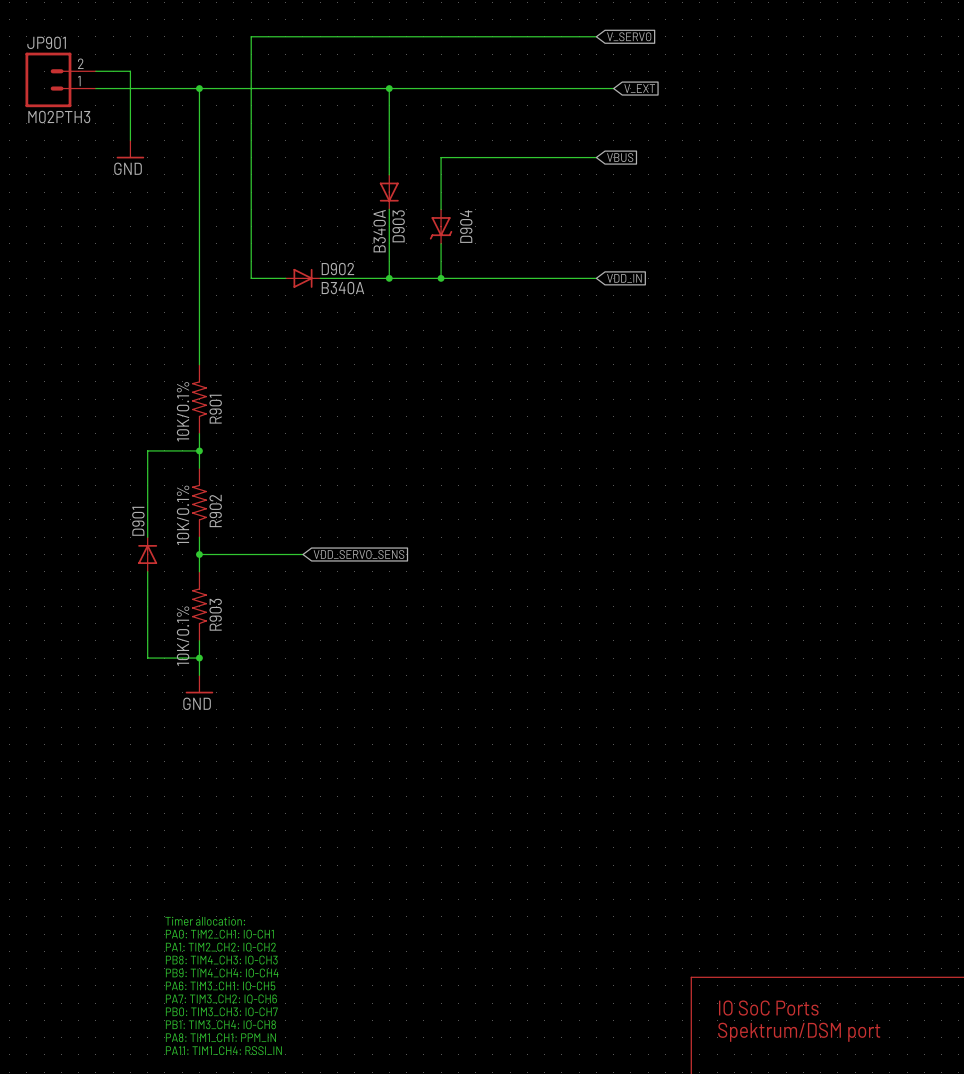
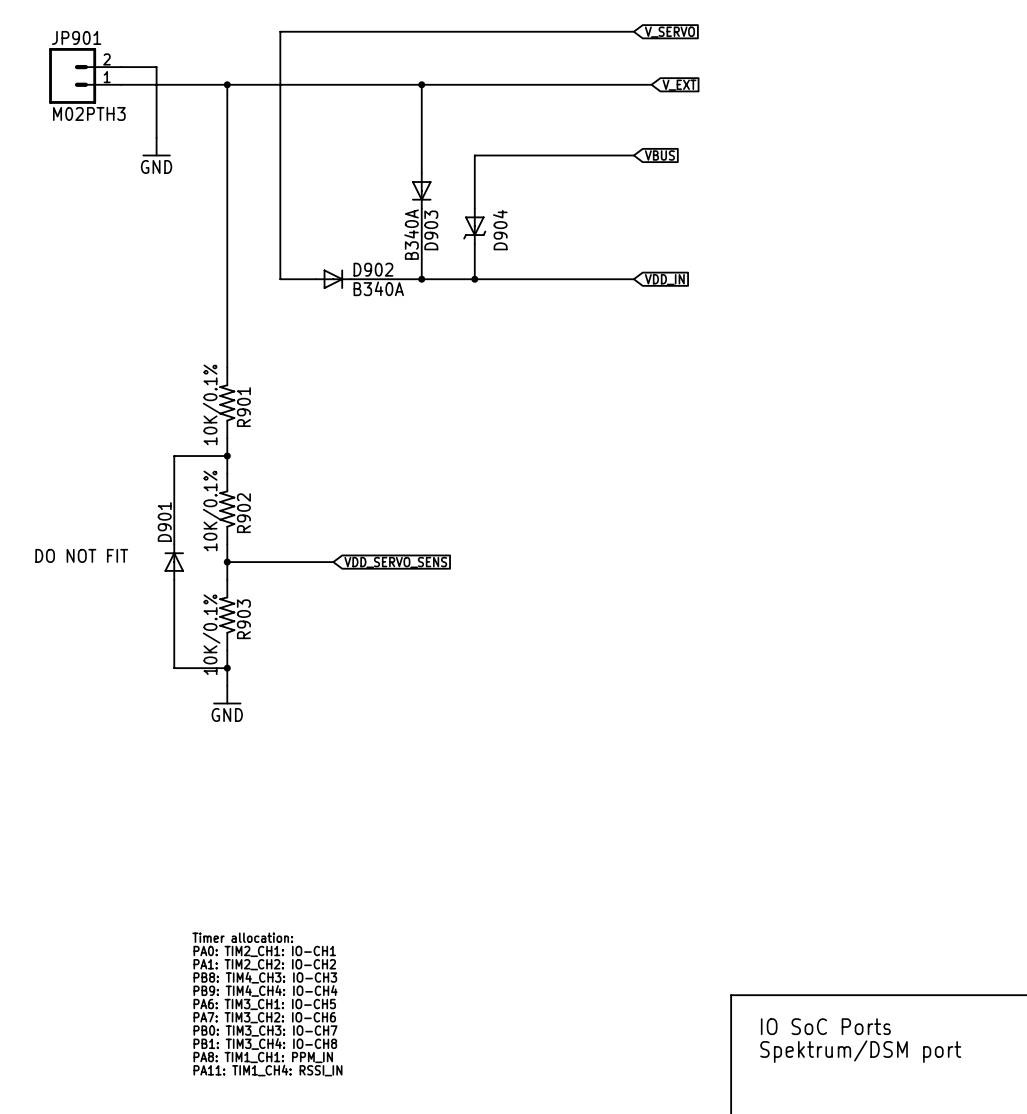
text: none -> DO NOT FIT (81, 555)

